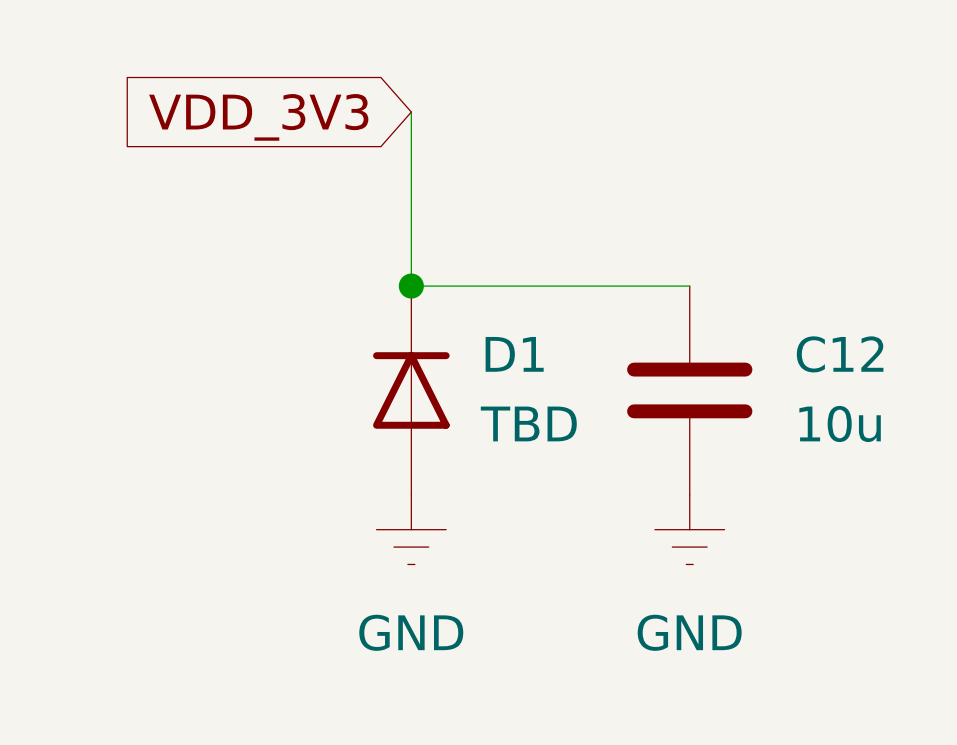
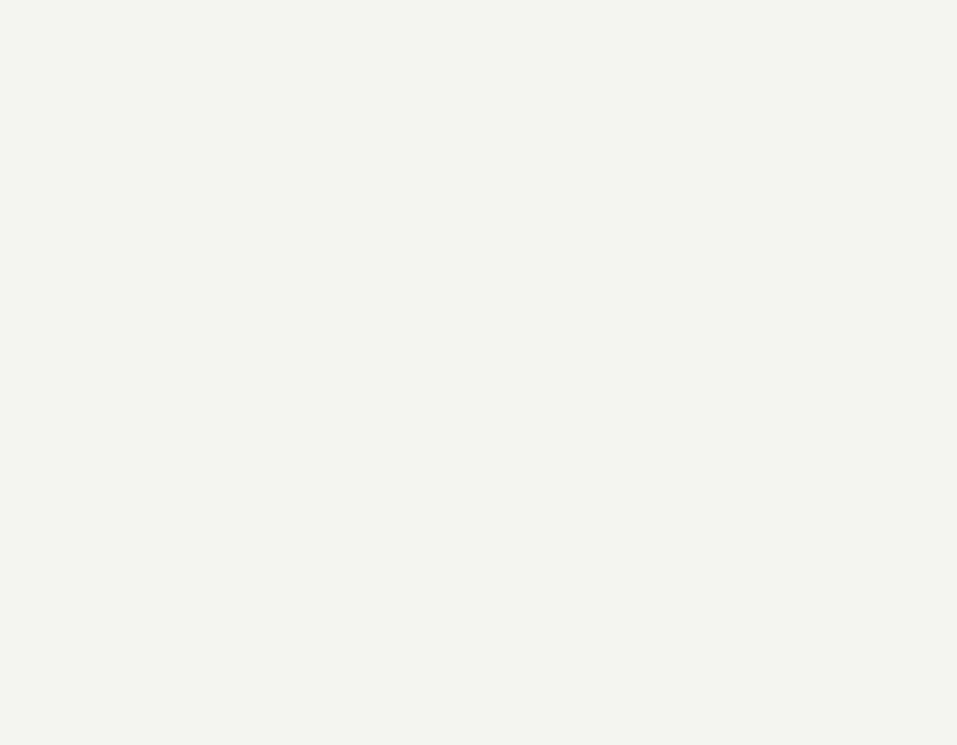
wire: (411, 112) (411, 286) (689, 286) -> none
global label: VDD_3V3 (258, 117) -> none
junction: (411, 286) -> none
D1: TBD (411, 390) -> none
C12: 10u (689, 390) -> none
power symbol: GND (411, 529) -> none
power symbol: GND (689, 529) -> none

